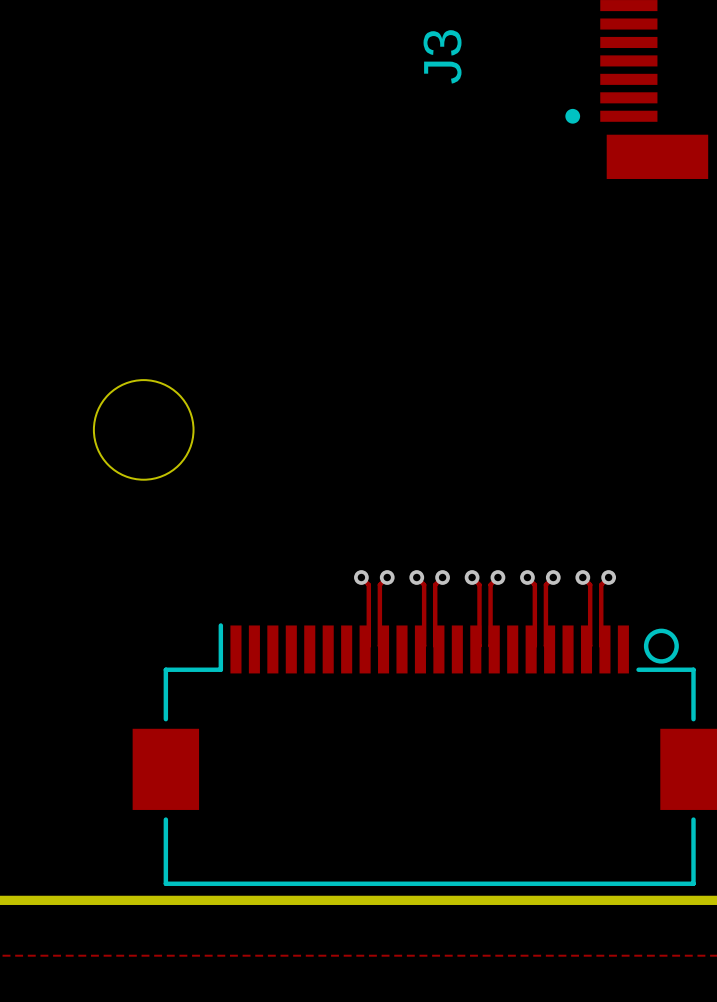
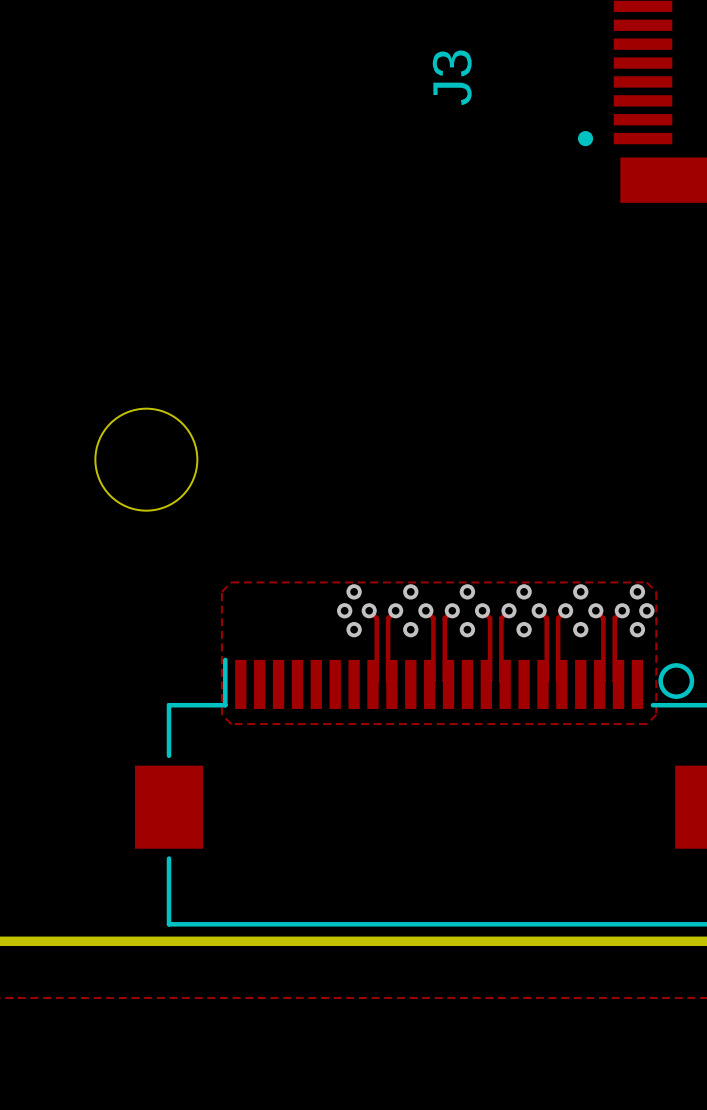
zone outline: none -> (231, 582) (221, 591) (221, 714) (231, 724) (646, 724) (656, 714) (656, 591) (646, 582) (231, 582)
via: none -> (354, 591)
via: none -> (410, 591)
via: none -> (467, 591)
via: none -> (524, 591)
via: none -> (580, 591)
via: none -> (637, 591)
via: none -> (344, 610)
via: none -> (646, 610)
via: none -> (354, 629)
via: none -> (410, 629)
via: none -> (467, 629)
via: none -> (524, 629)
via: none -> (580, 629)
via: none -> (637, 629)

